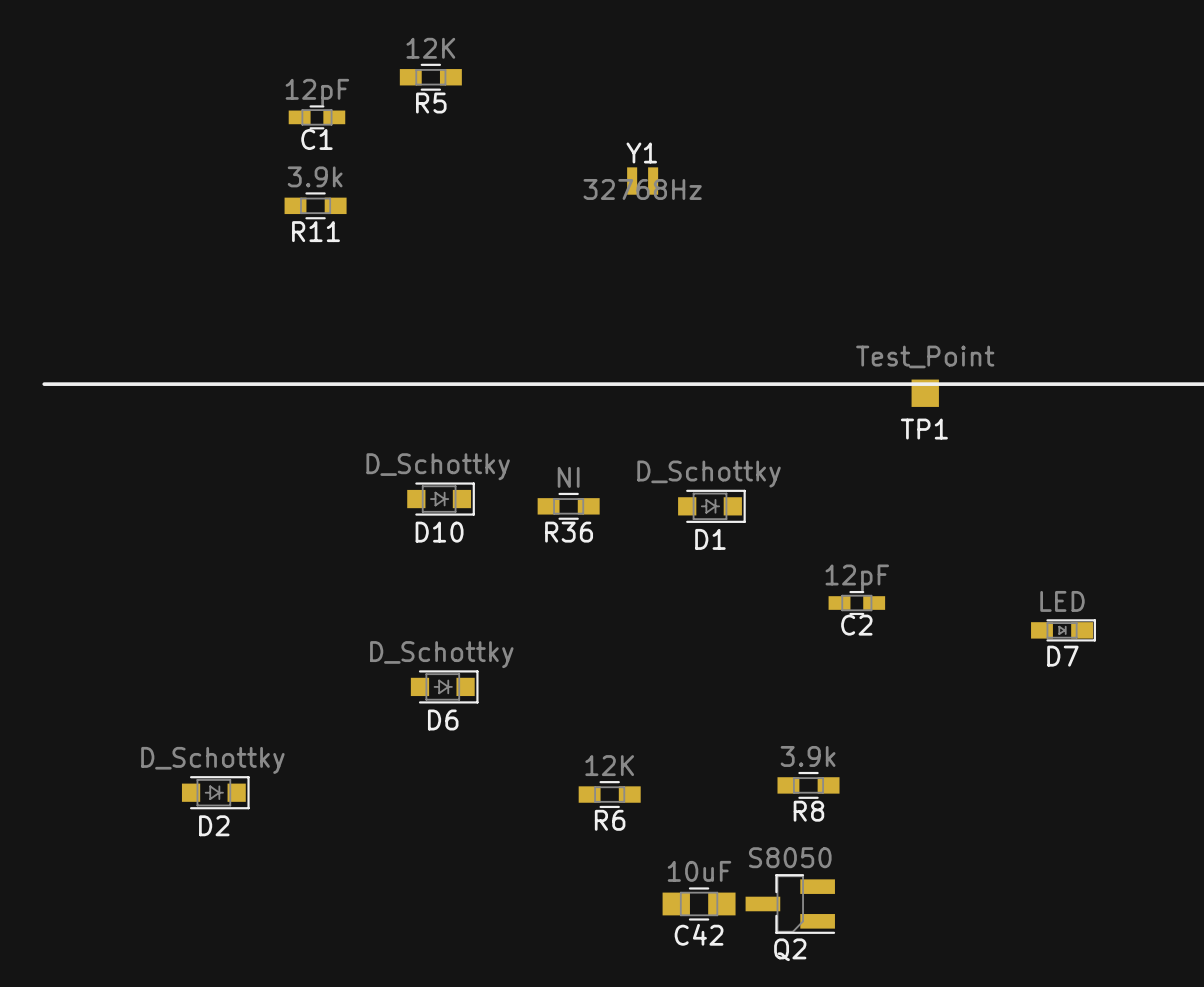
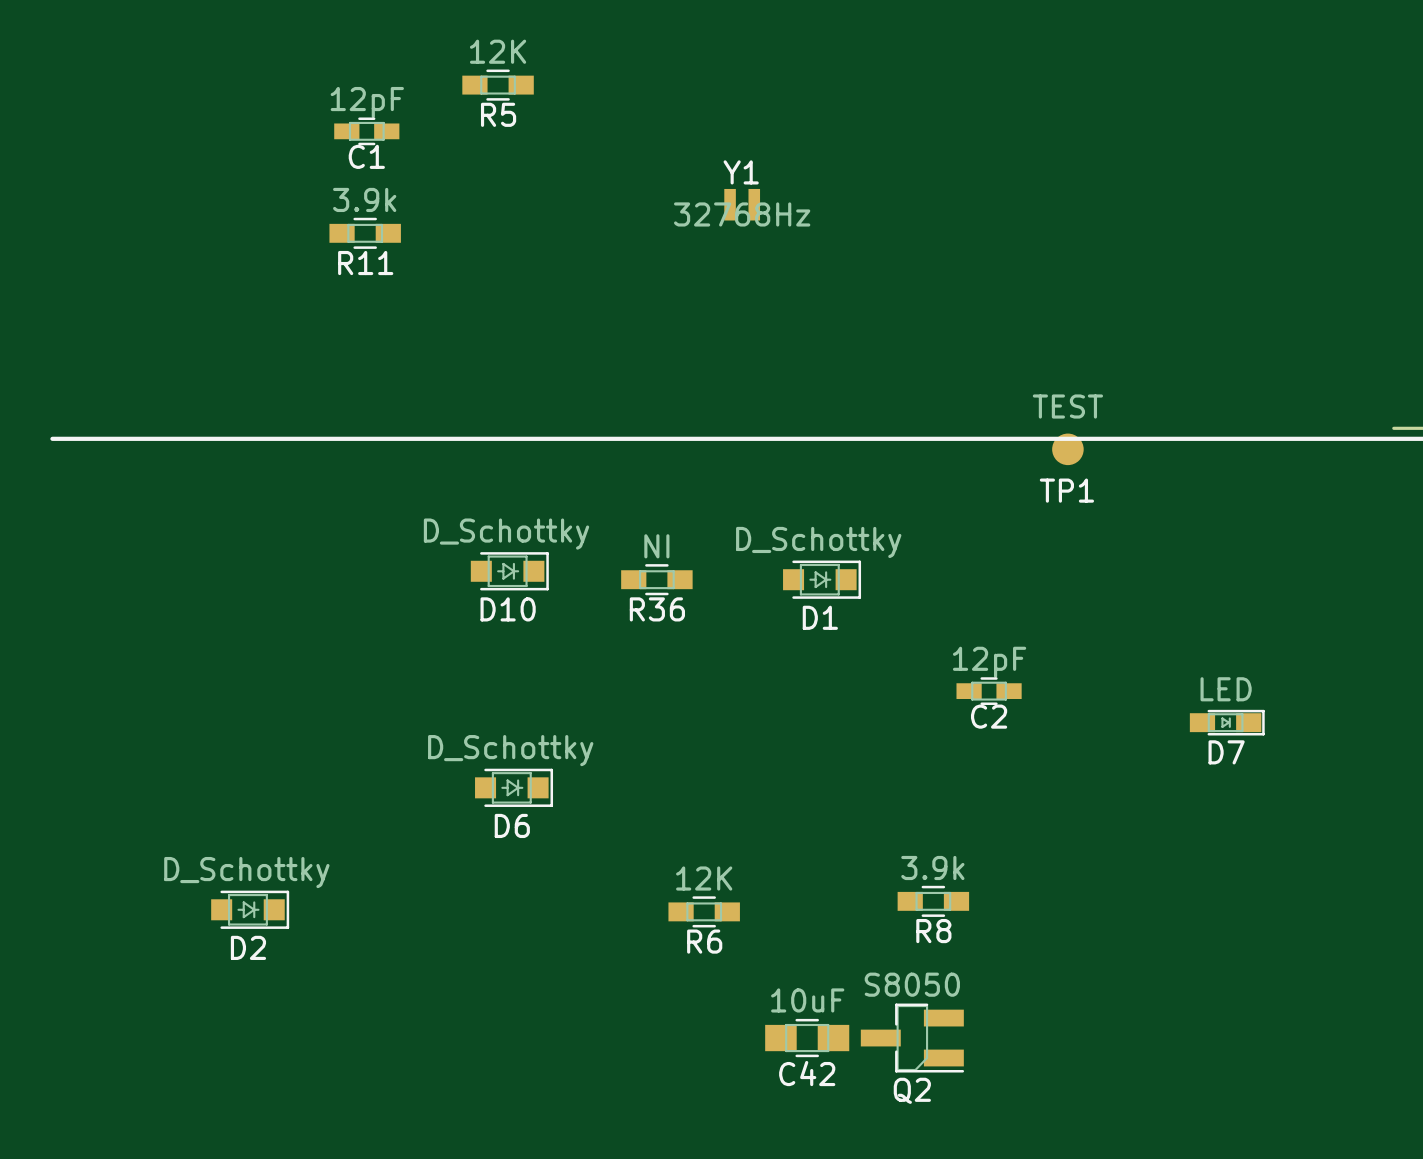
TP1 value: Test_Point (925, 356) -> TEST (1067, 406)
TP1 footprint: [911, 379, 939, 407] -> [1052, 433, 1084, 466]

